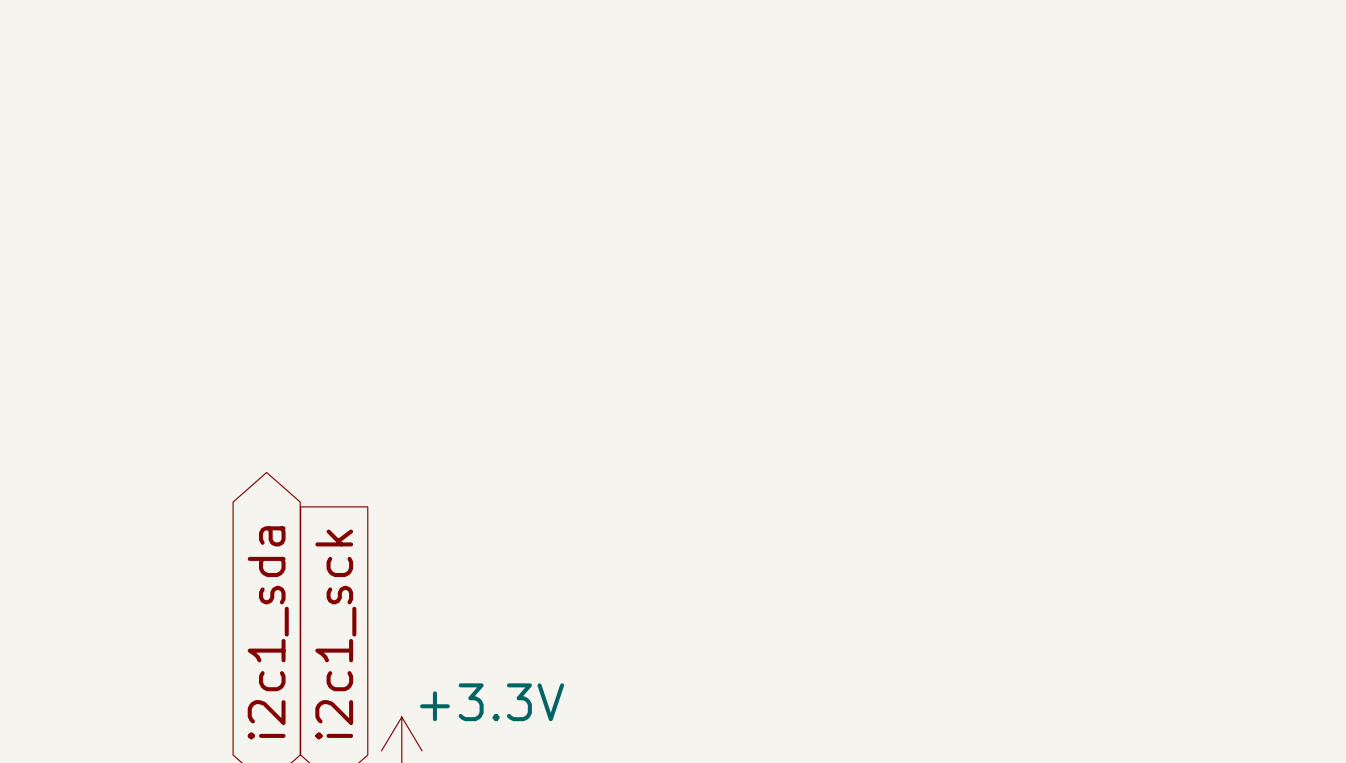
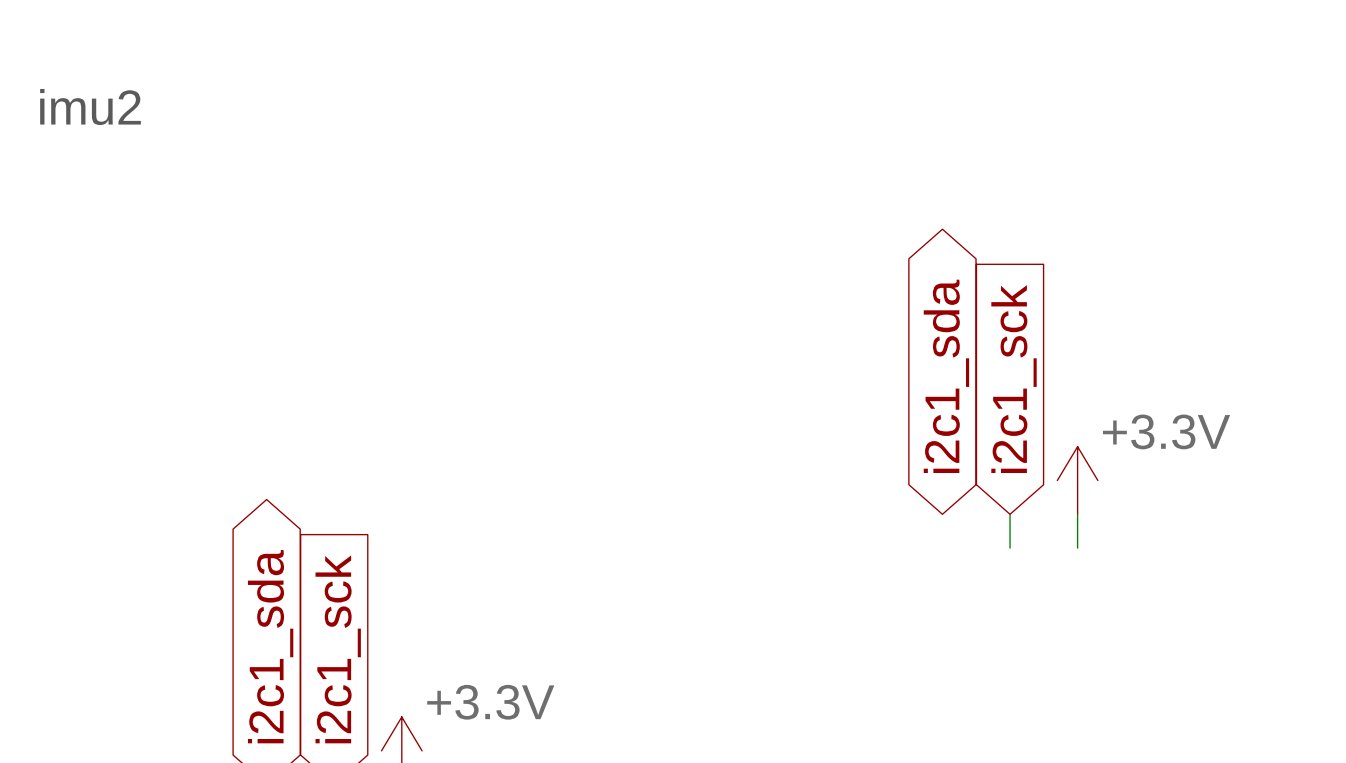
text: none -> imu2 (90, 107)
global label: none -> i2c1_sda (946, 376)
global label: none -> i2c1_sck (1014, 379)
power symbol: none -> +3.3V (1077, 480)
wire: none -> (1010, 514) (1010, 548)
wire: none -> (1077, 514) (1077, 548)

